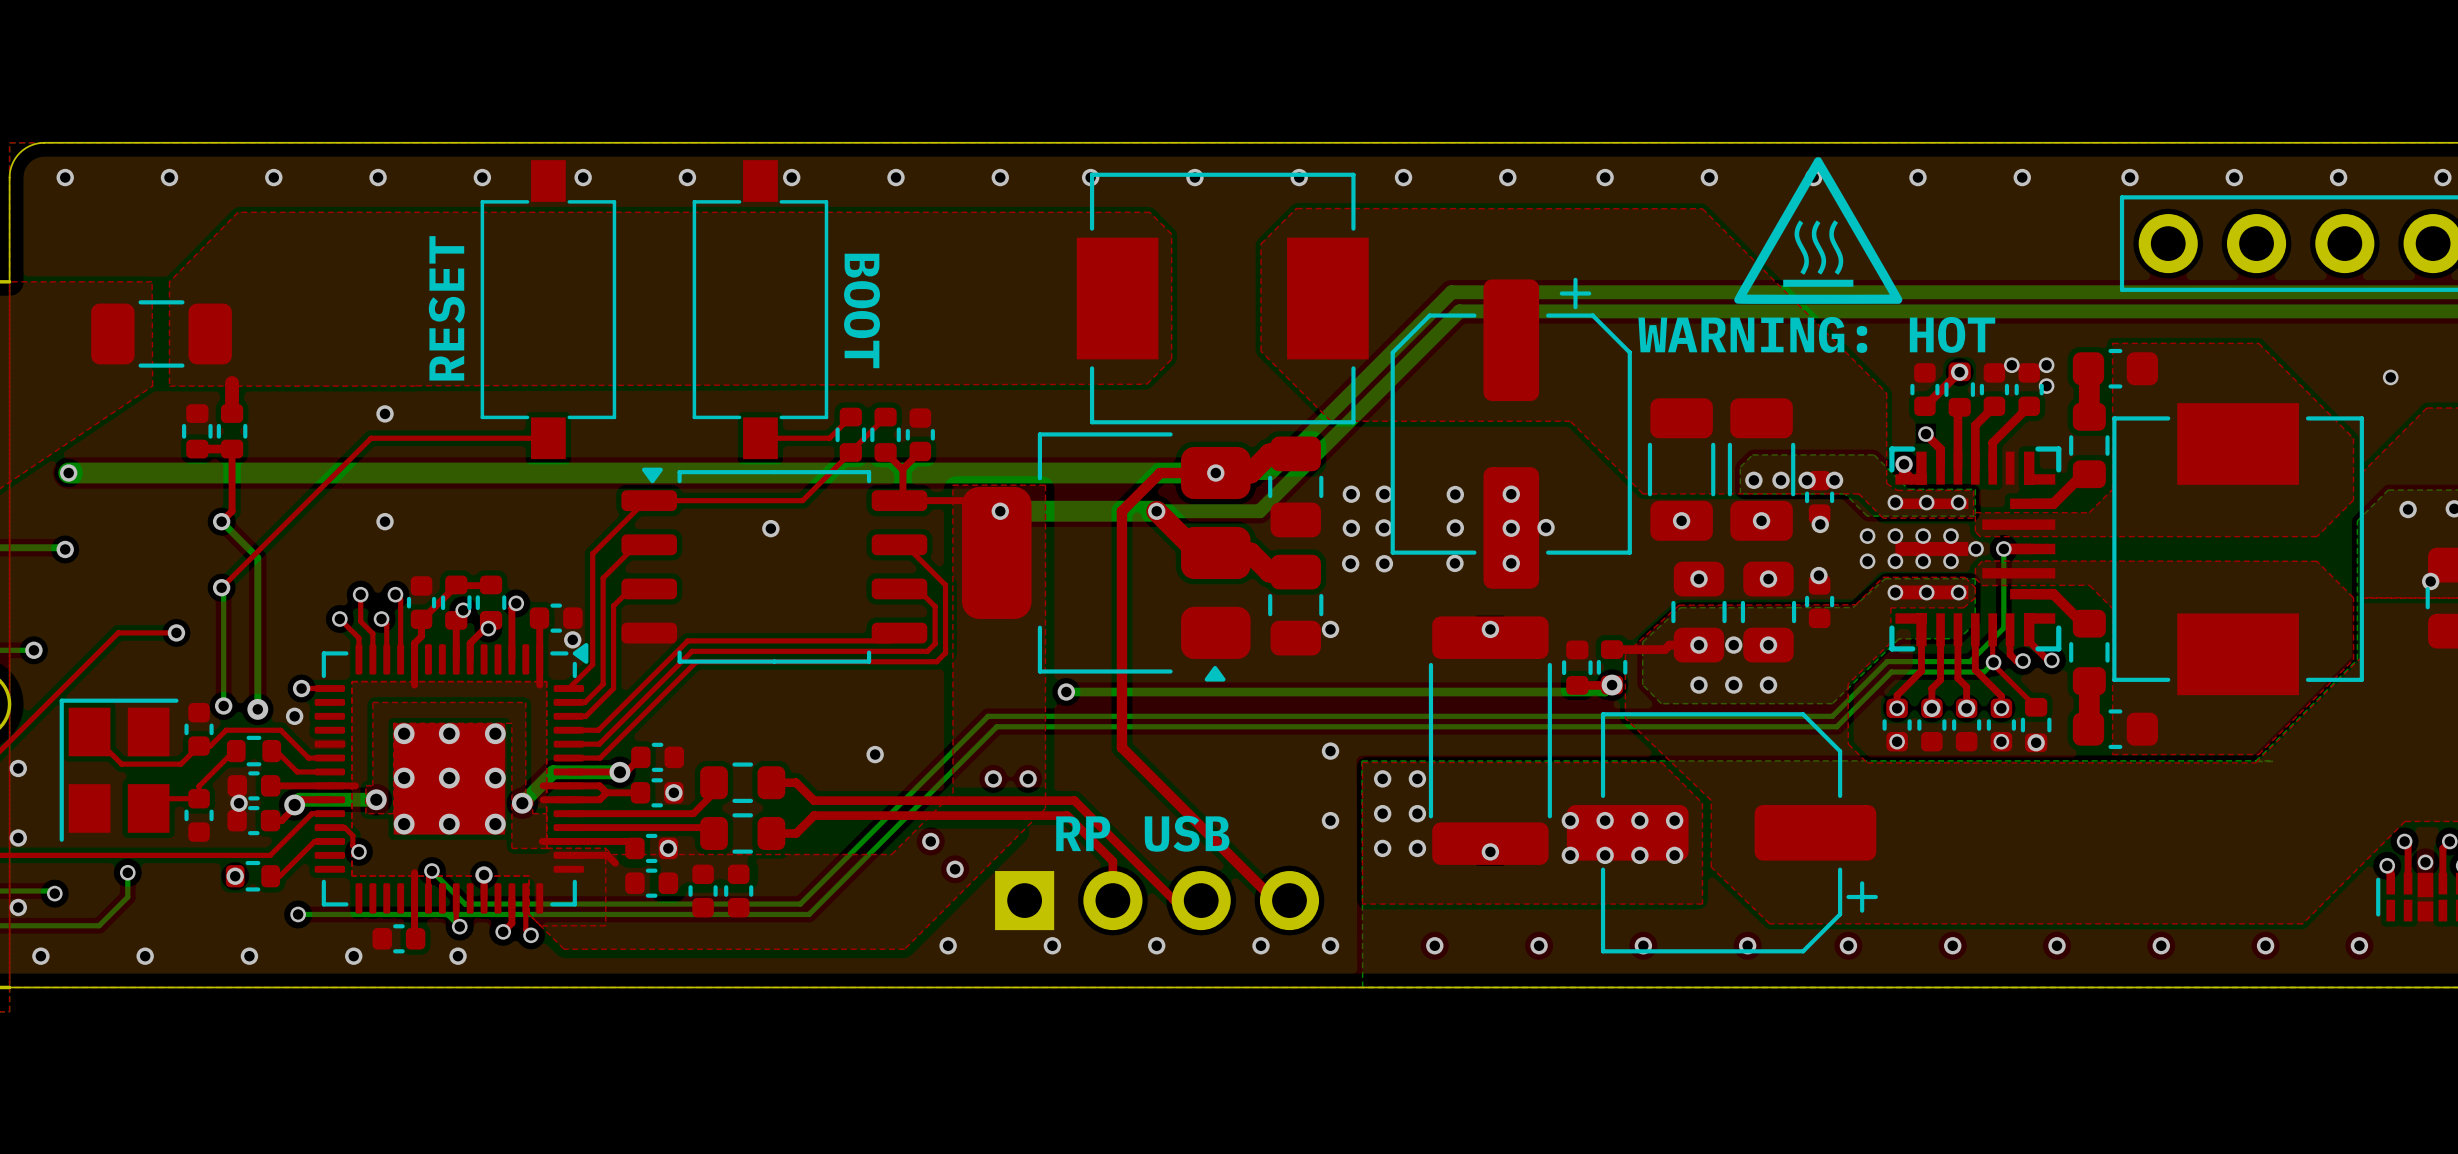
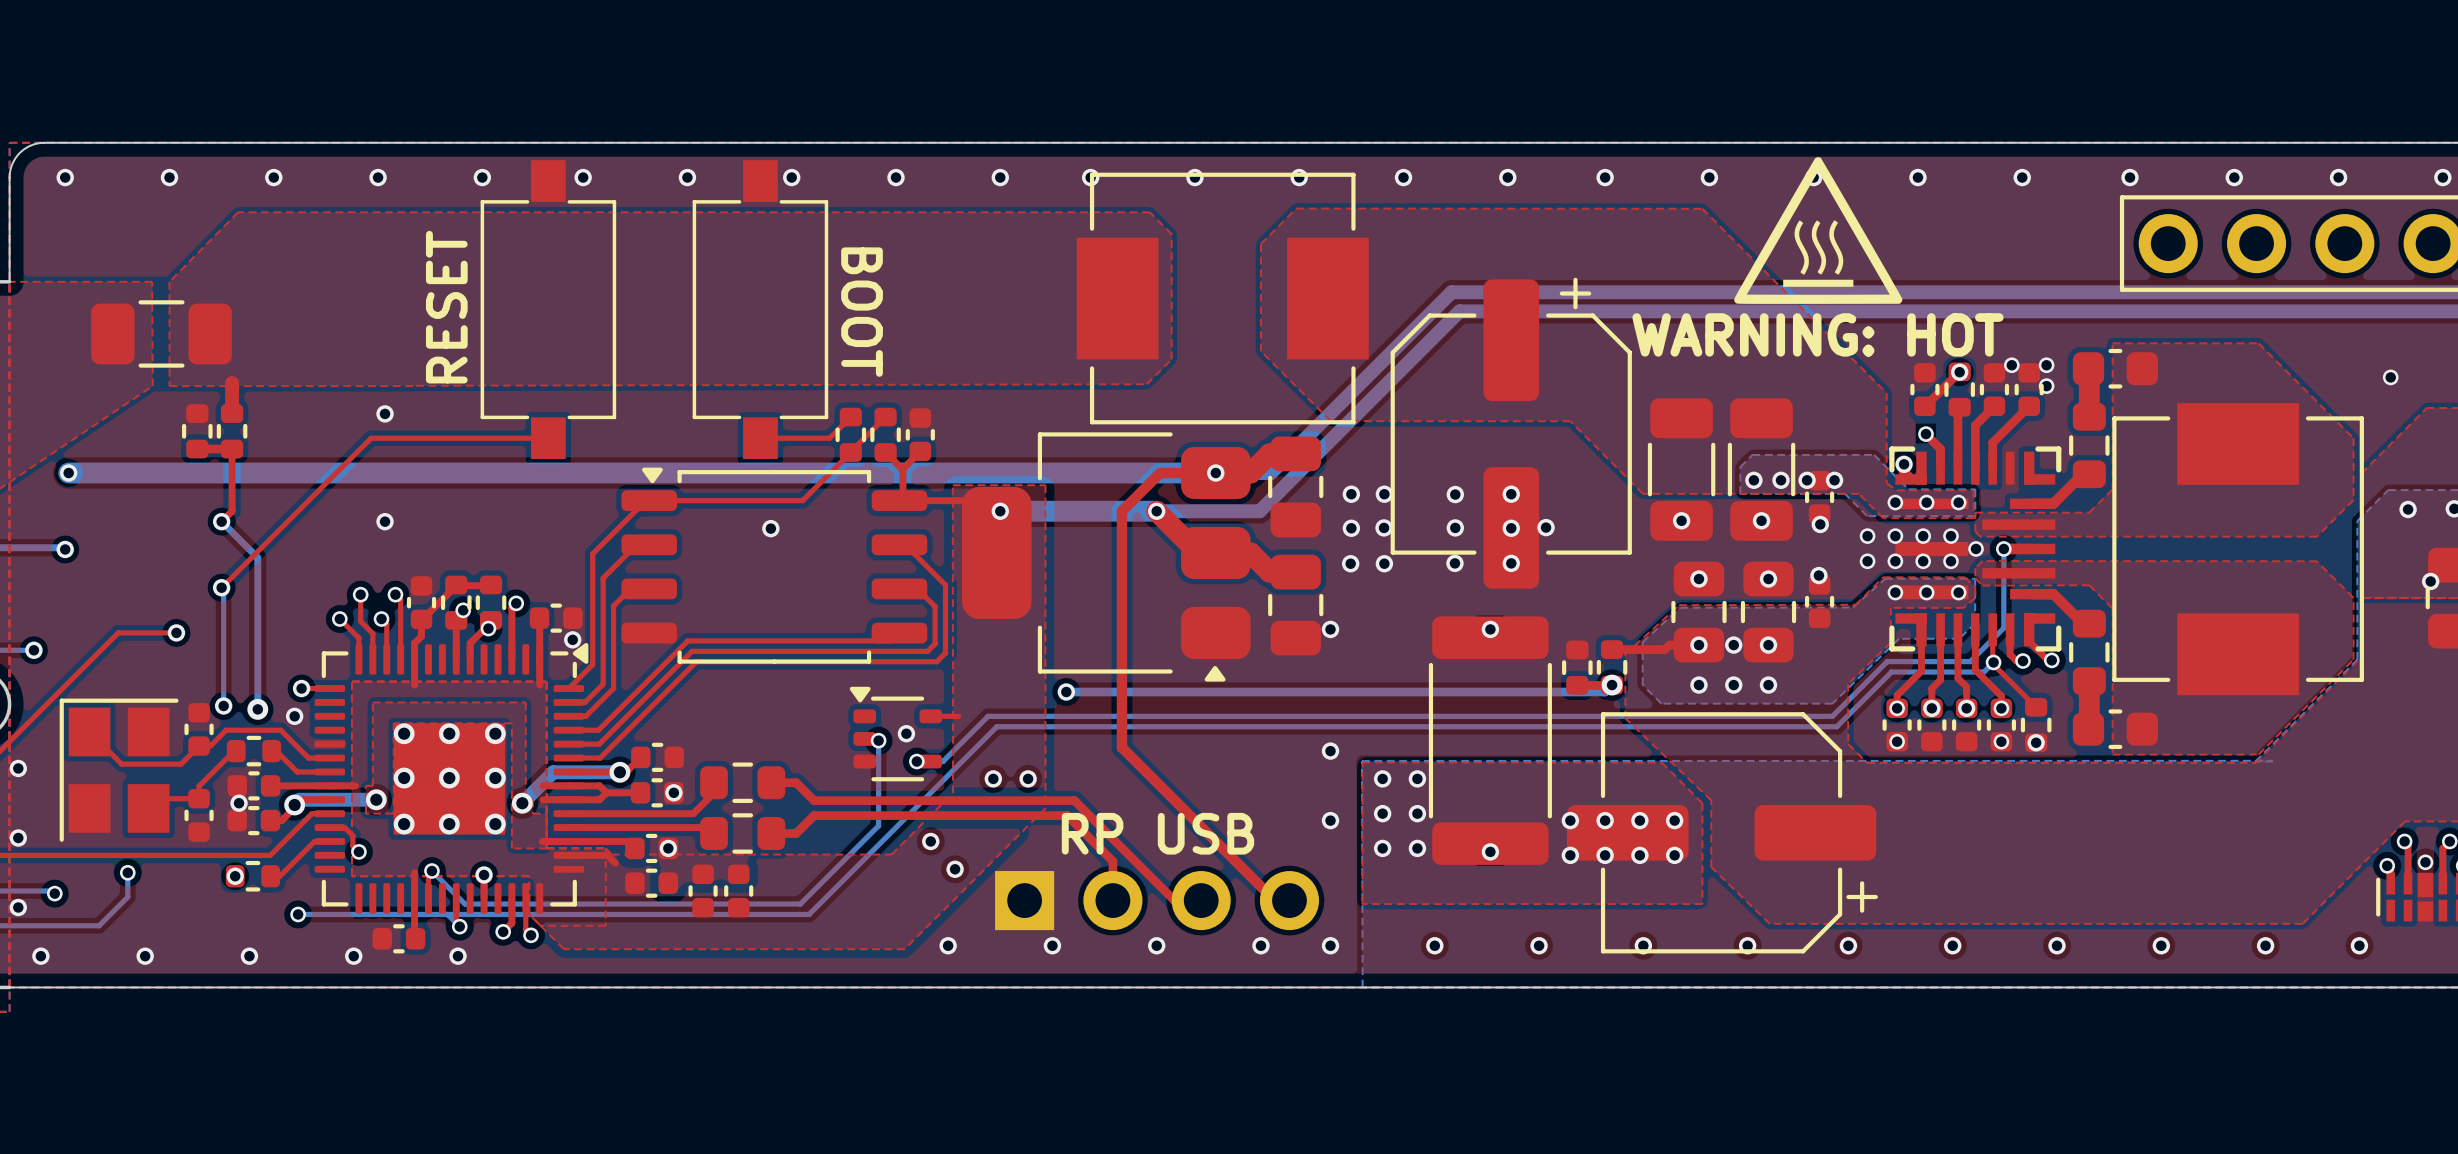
top track: none -> (930, 716) (958, 716)
part: none -> (895, 734)
via: none -> (878, 740)
via position: (875, 754) -> (906, 733)
via: none -> (916, 761)
bottom track: (942, 761) (878, 825) -> (878, 740) (878, 825)

